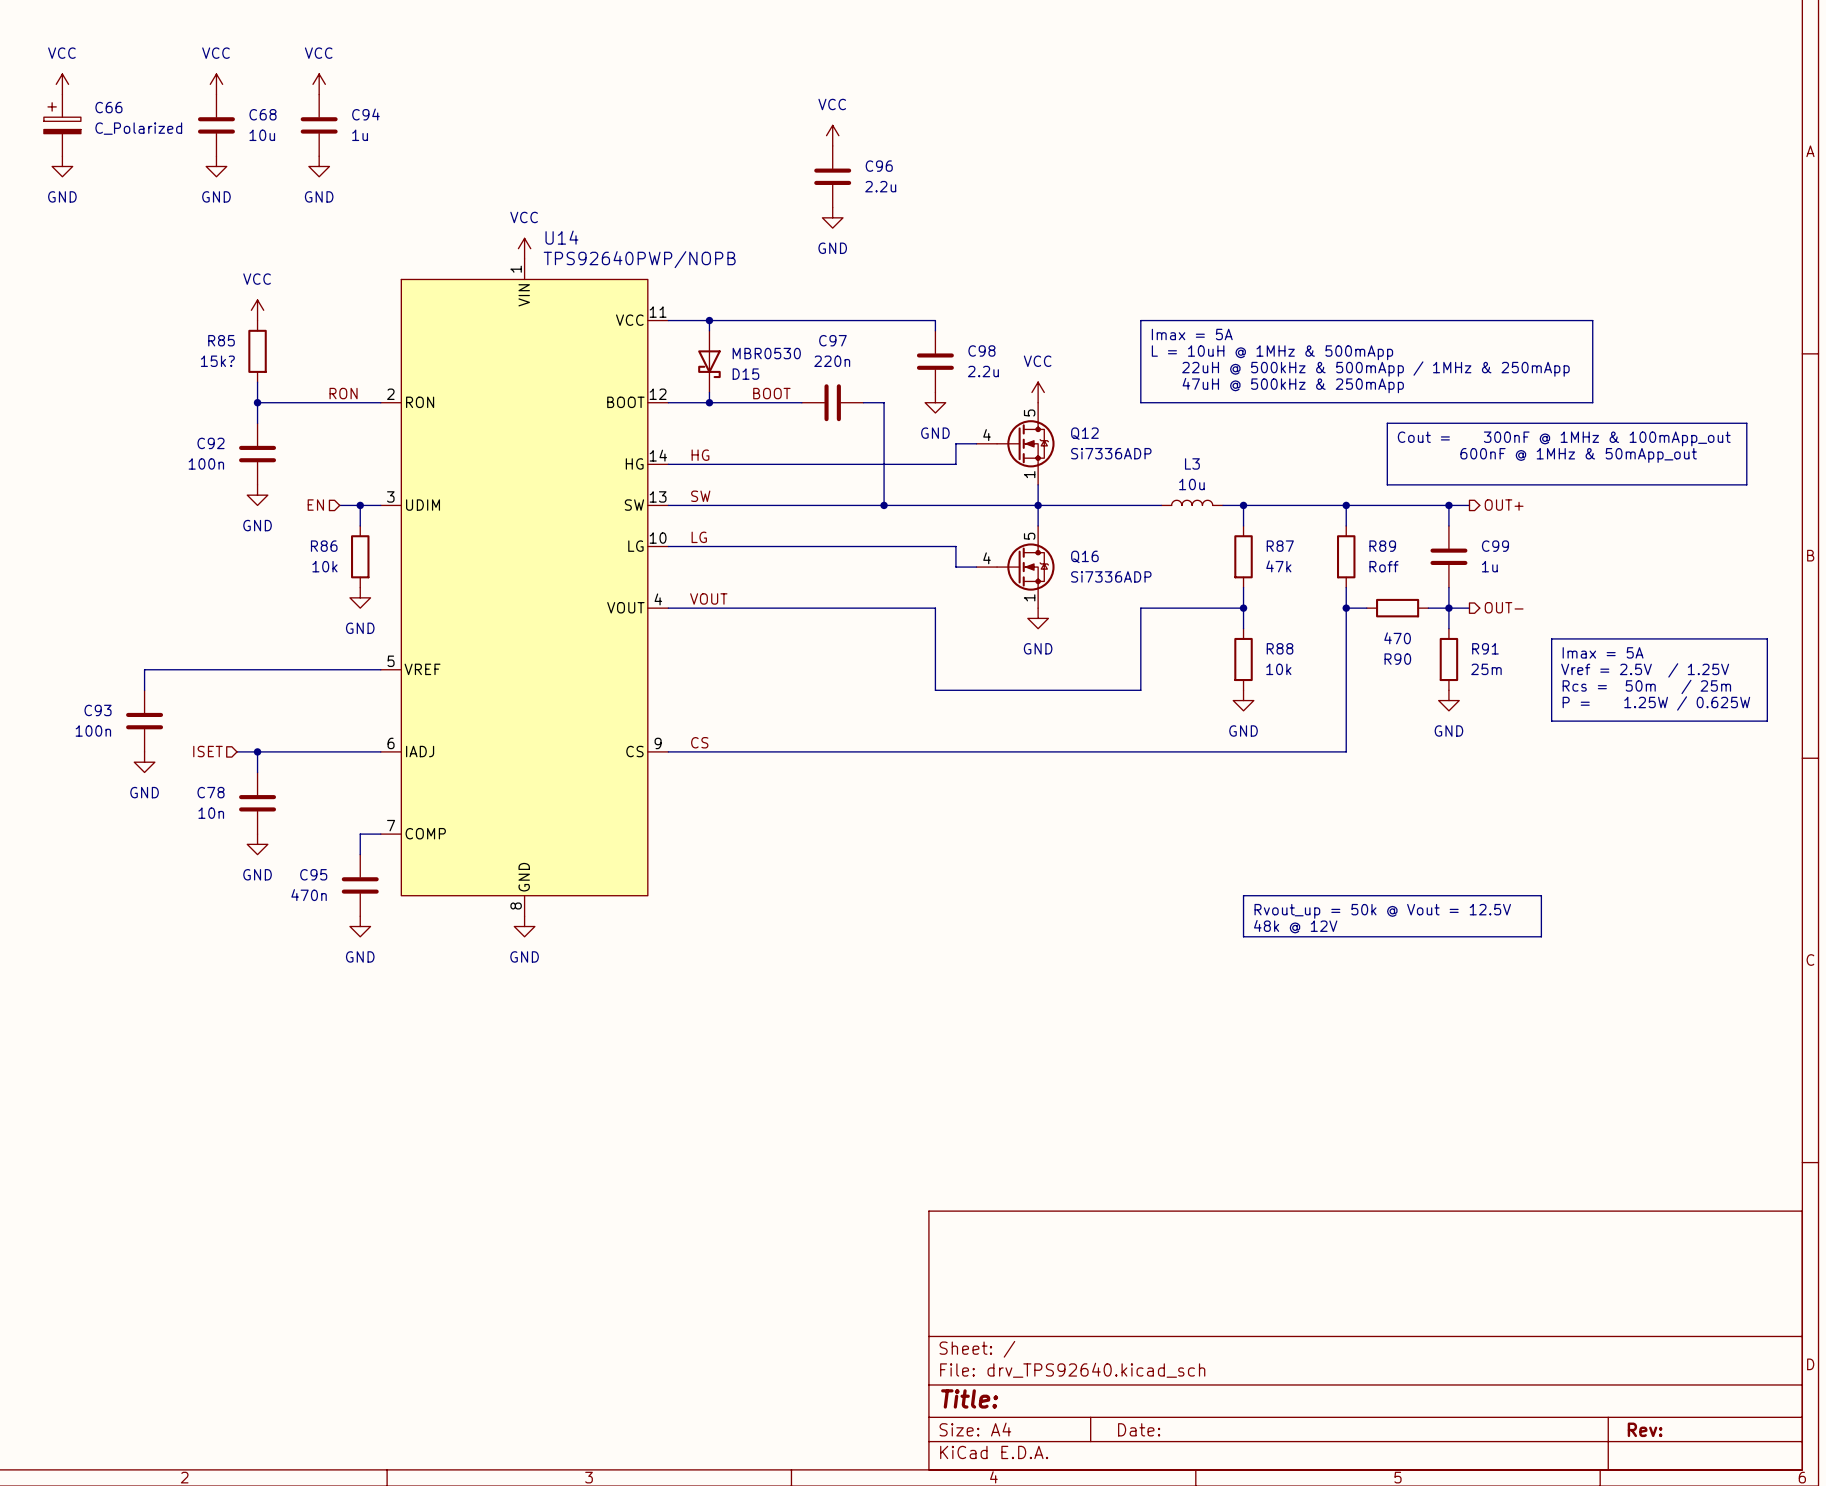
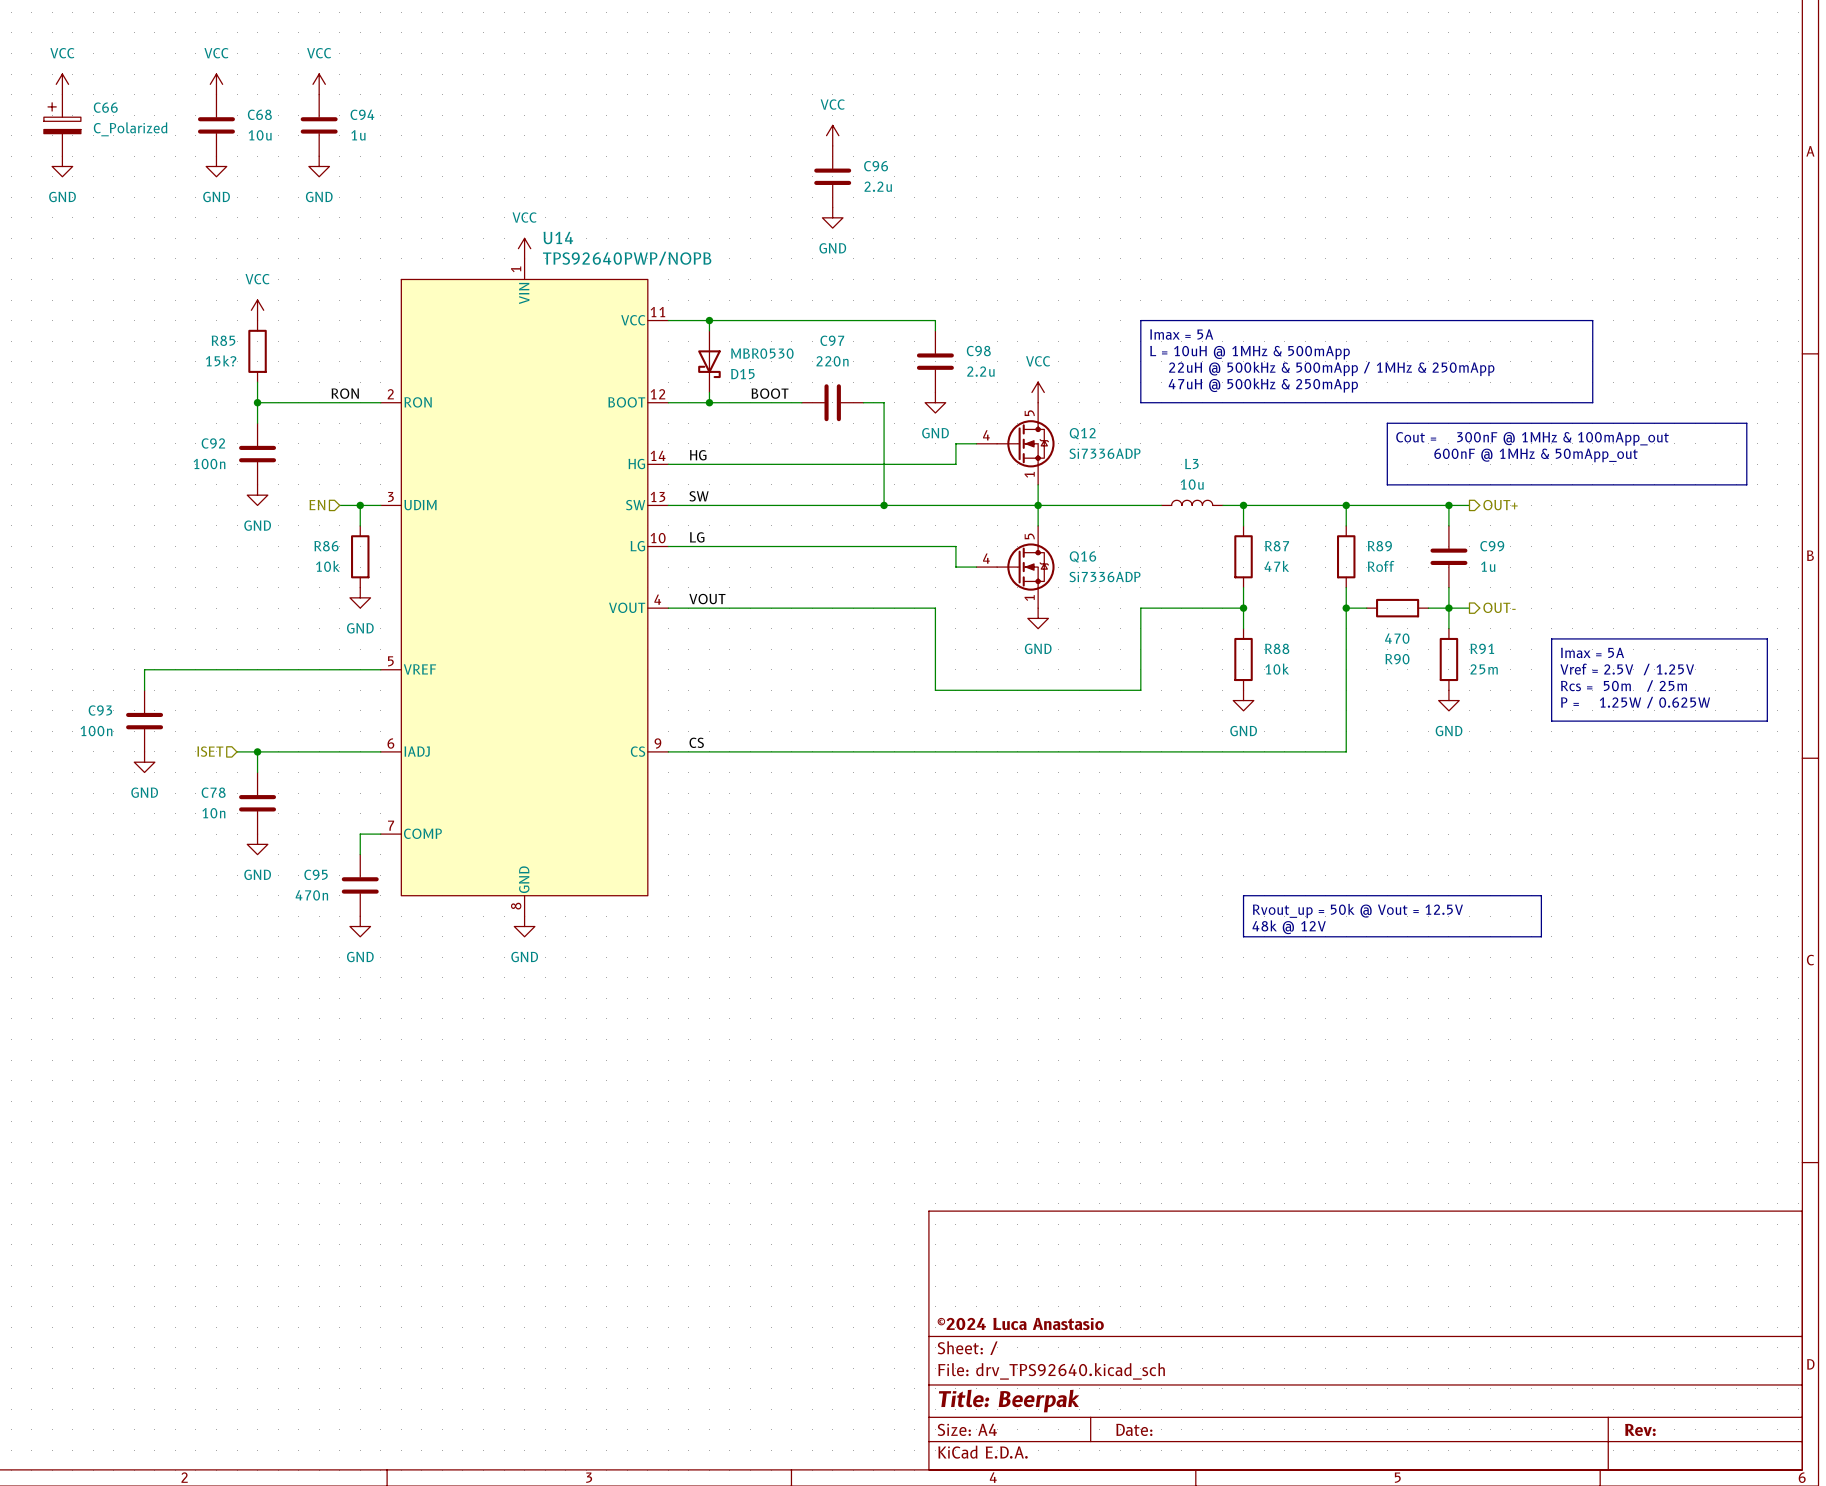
title block: none -> ©2024 Luca Anastasio (1020, 1323)
title block: Title: (969, 1398) -> Title: Beerpak (1009, 1401)

